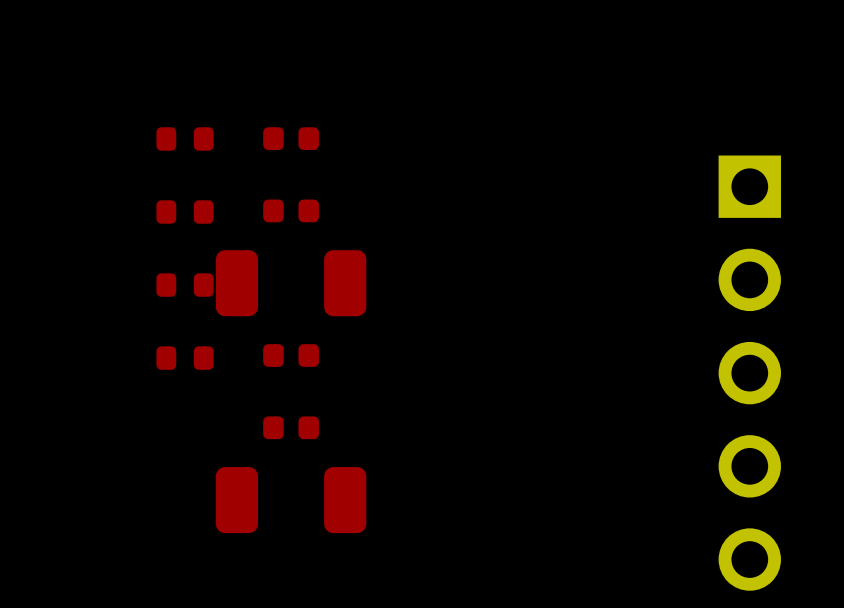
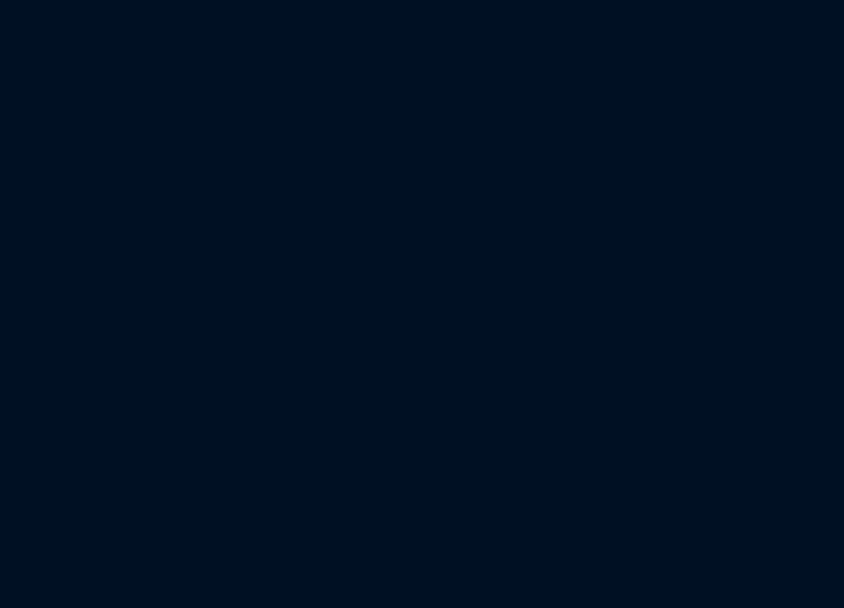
part: (185, 138) -> none
part: (291, 138) -> none
part: (291, 210) -> none
part: (185, 212) -> none
part: (291, 283) -> none
part: (185, 285) -> none
part: (291, 355) -> none
part: (185, 358) -> none
part: (749, 373) -> none
part: (291, 427) -> none
part: (291, 500) -> none

